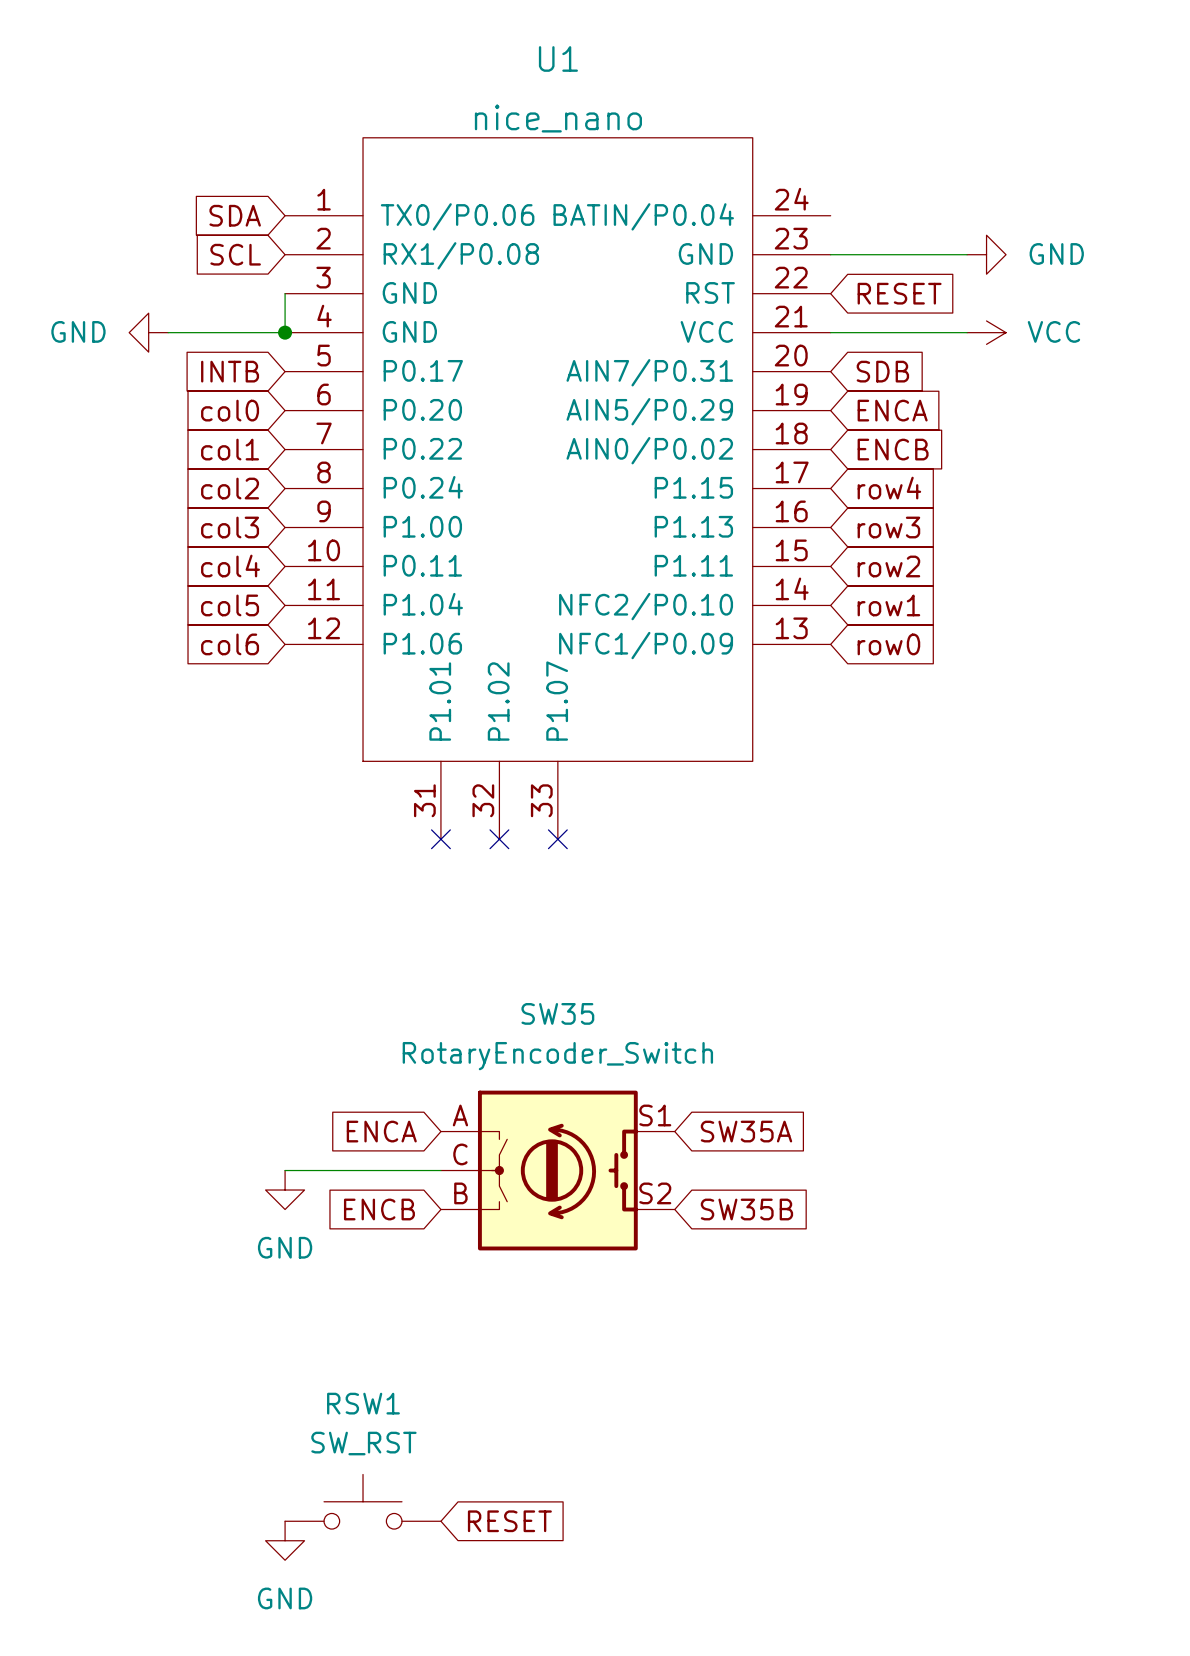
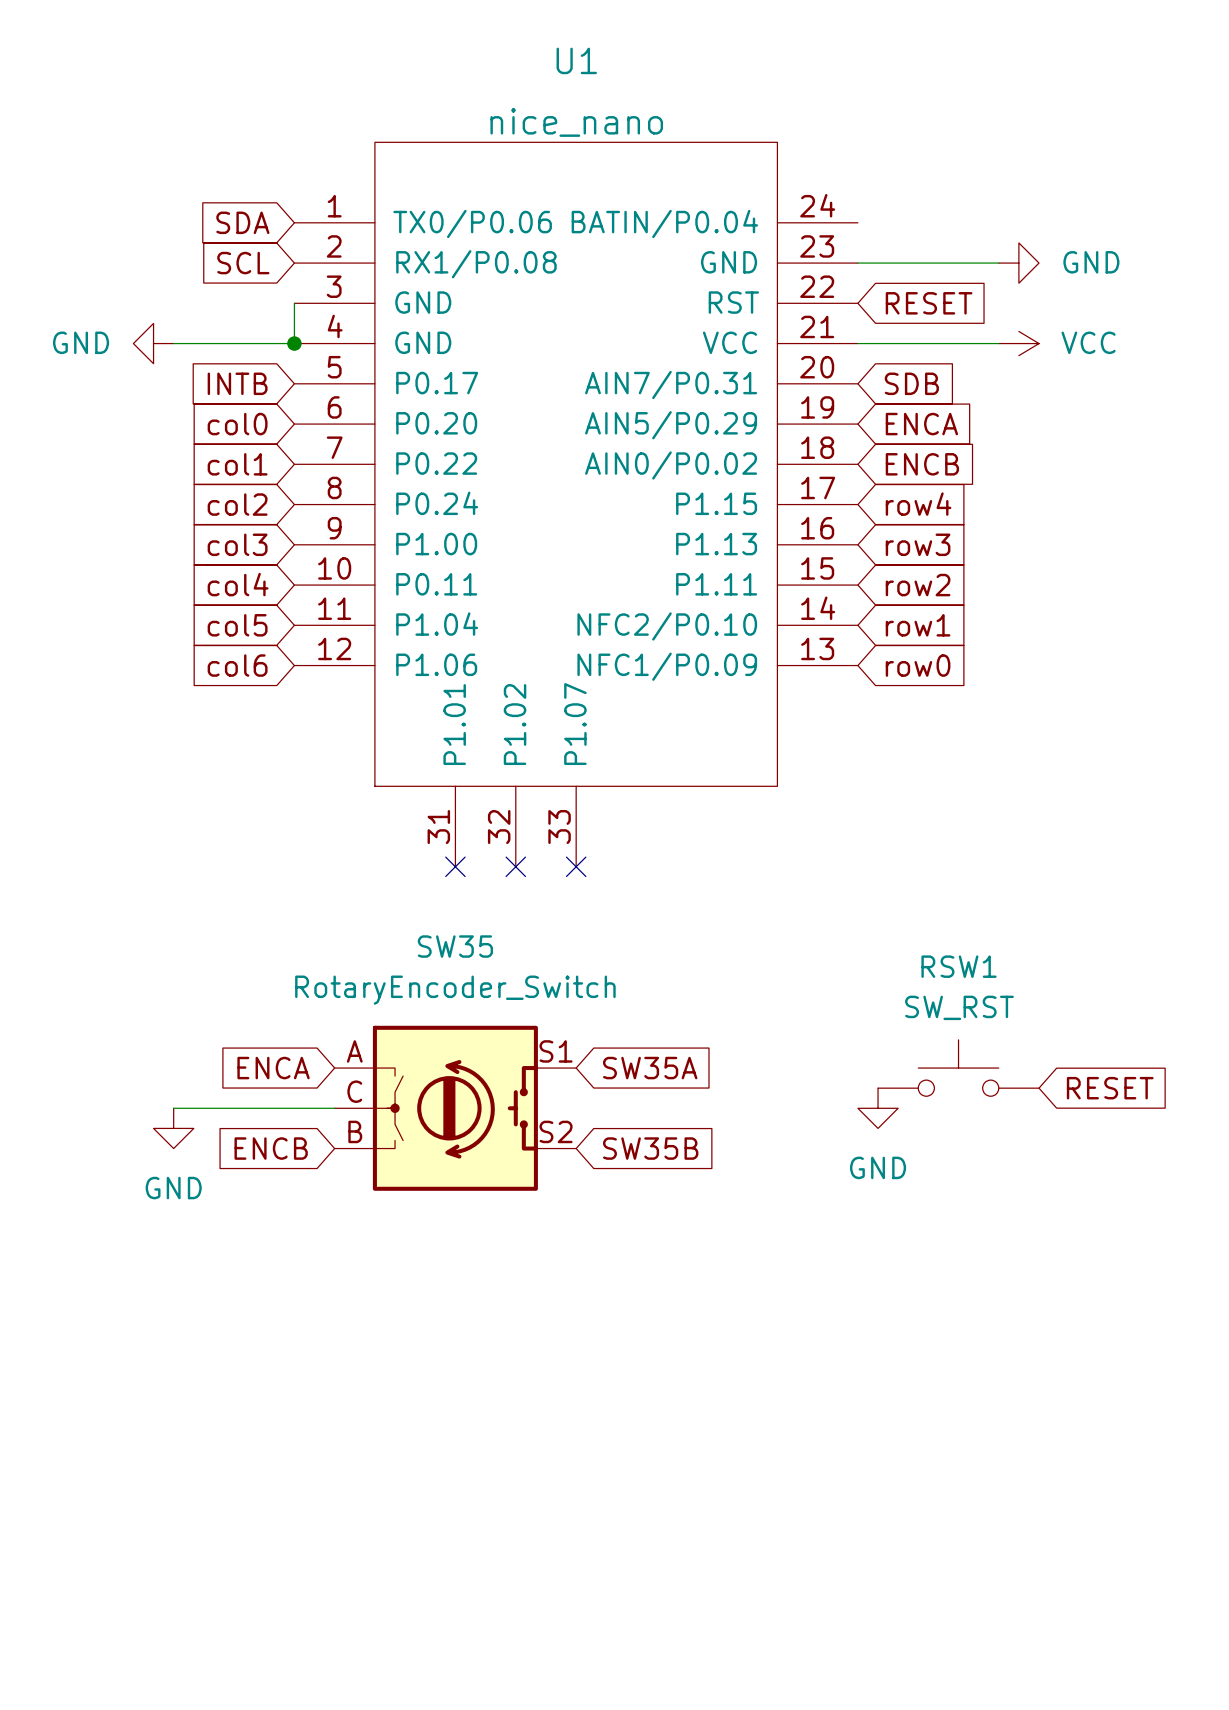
global label: none -> RESET (1110, 1088)
power symbol: none -> GND (878, 1108)
global label position: ENCA (381, 1131) -> ENCA (273, 1068)
global label position: SW35A (746, 1131) -> SW35A (650, 1068)
wire: (285, 1170) (440, 1170) -> (173, 1108) (334, 1108)
SW35 position: (557, 1170) -> (455, 1108)
power symbol position: GND (285, 1190) -> GND (173, 1128)
global label position: ENCB (379, 1209) -> ENCB (271, 1148)
global label position: SW35B (746, 1209) -> SW35B (650, 1148)
RSW1 position: (363, 1501) -> (958, 1068)
global label: RESET (509, 1521) -> none
power symbol: GND (285, 1540) -> none

